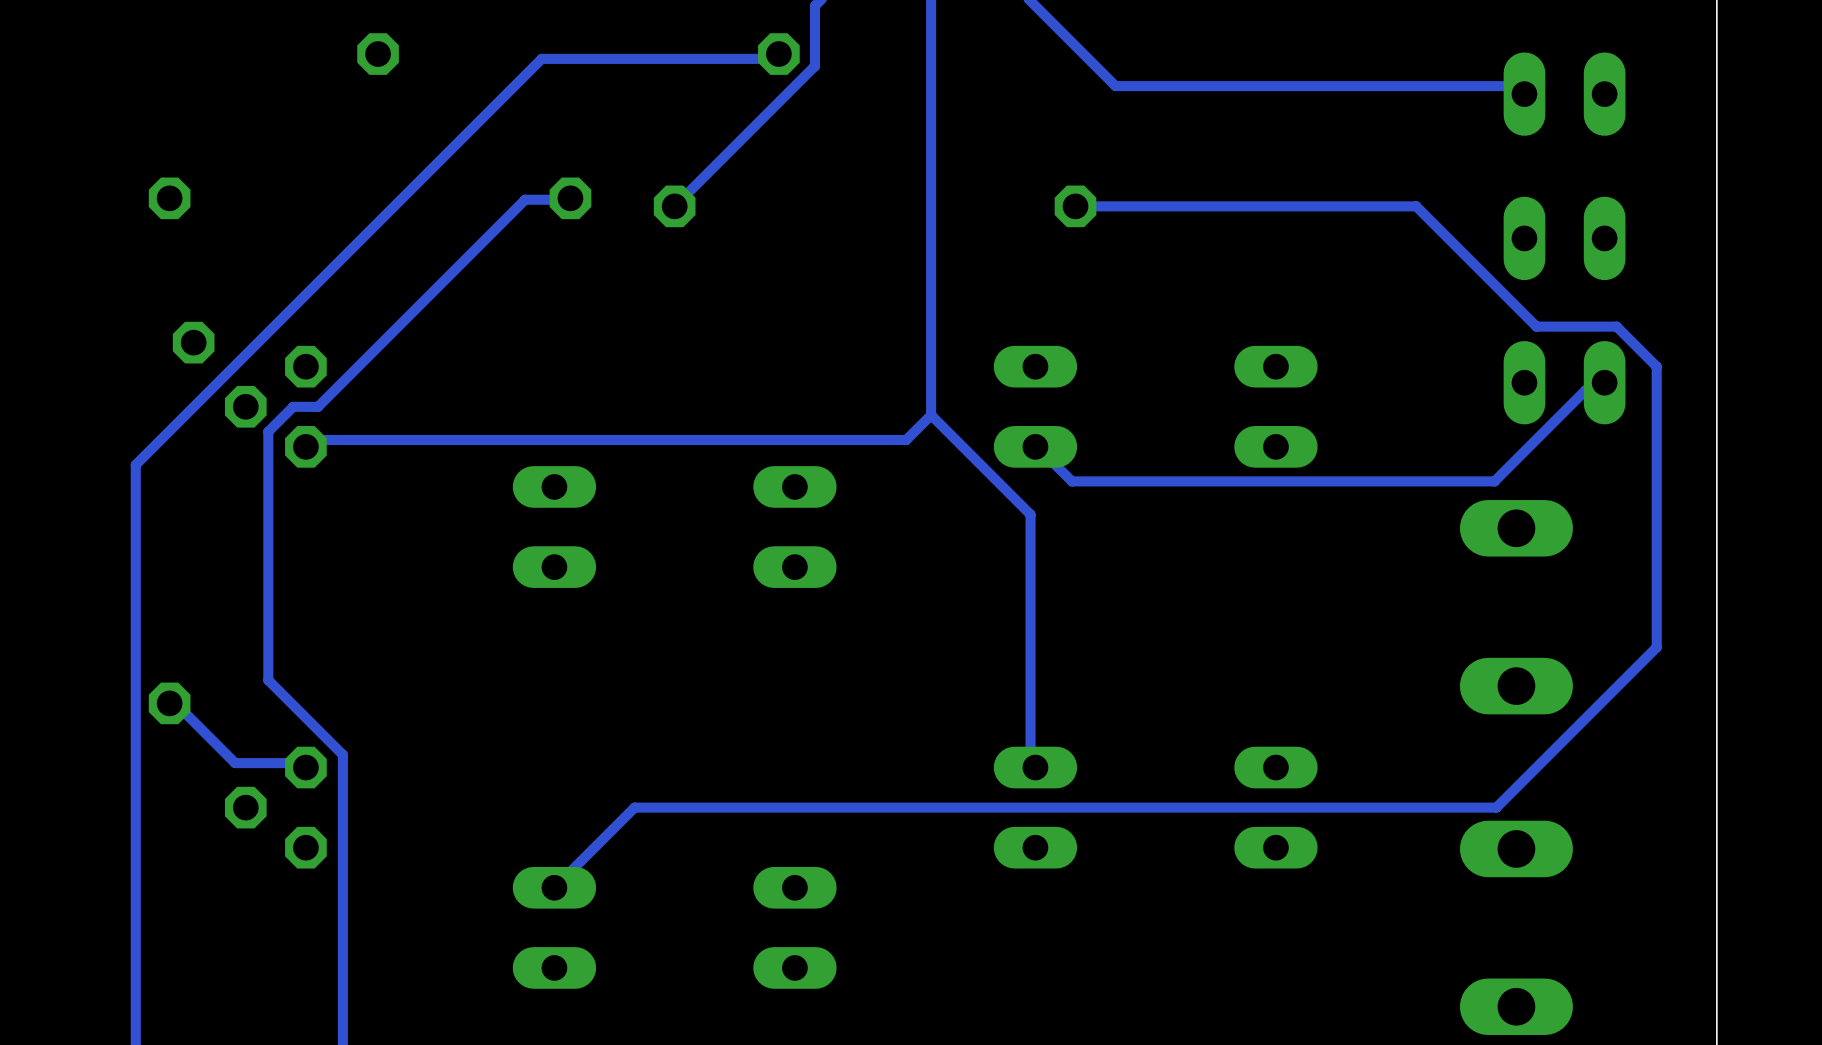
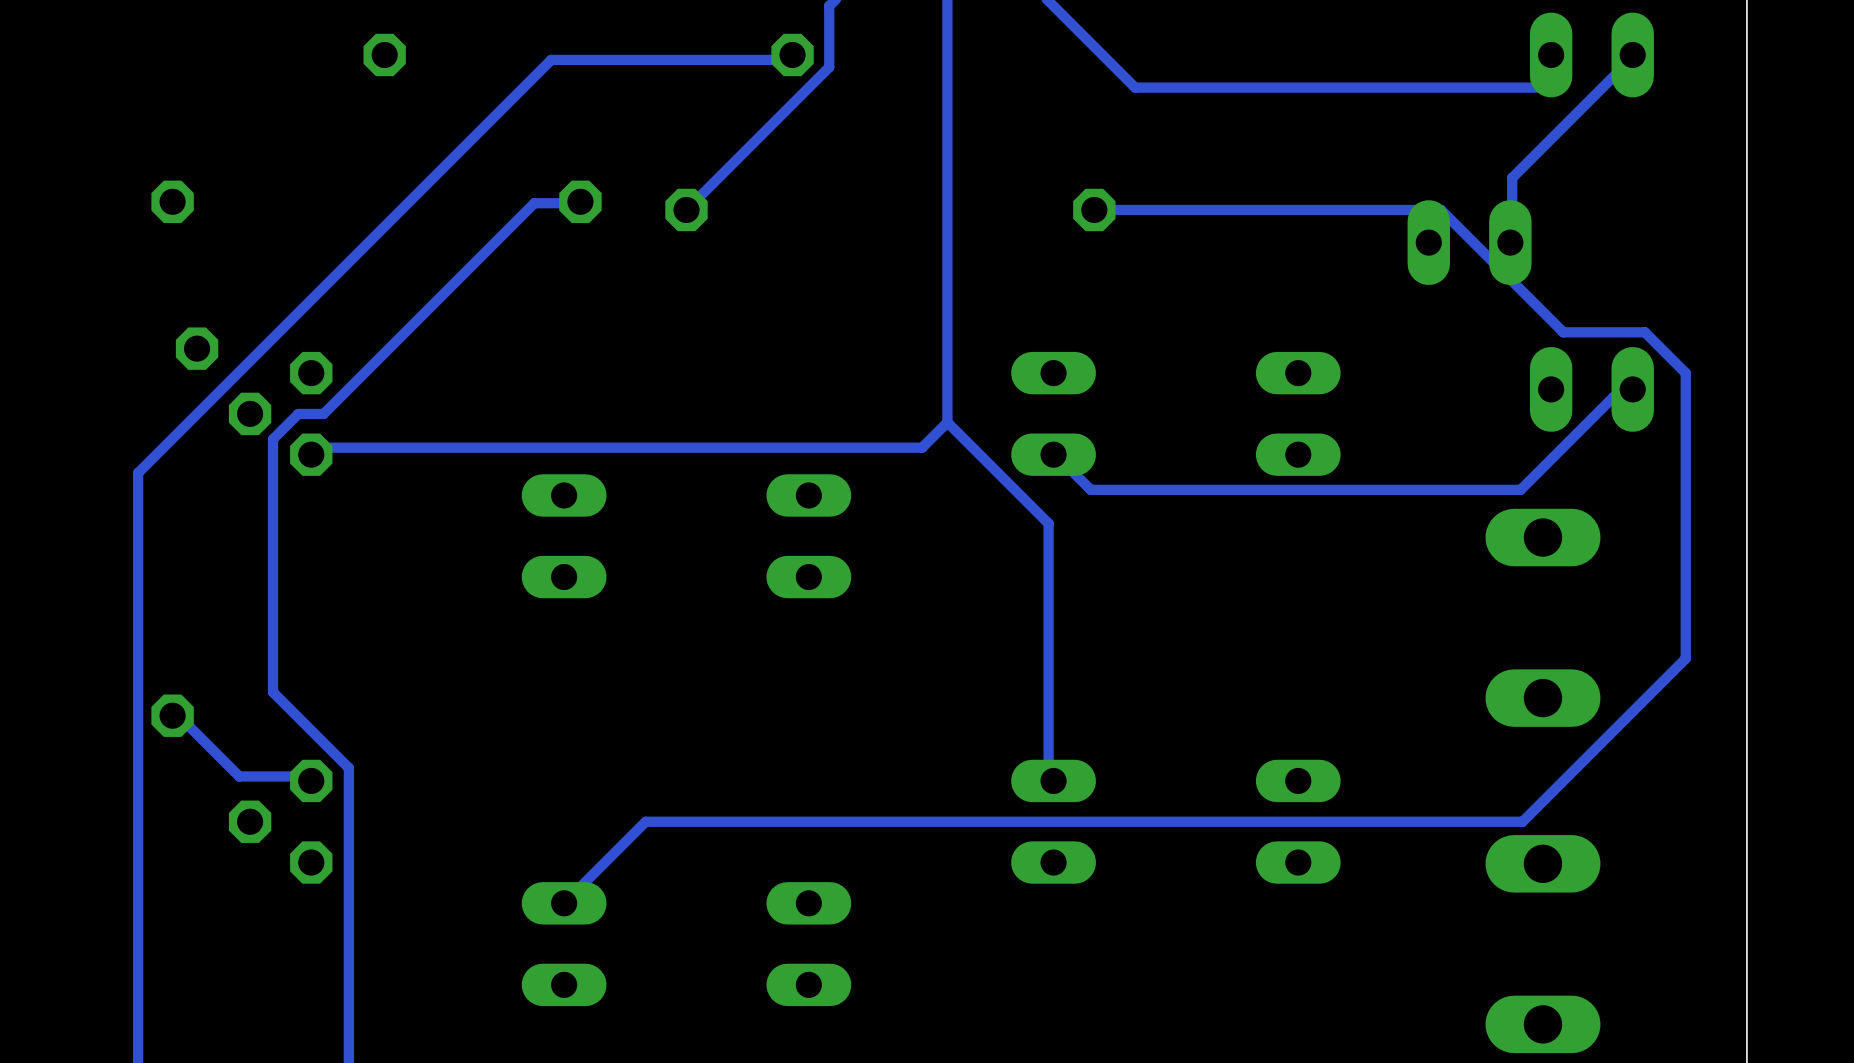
track: none -> (1632, 54) (1630, 59) (1512, 177) (1512, 236) (1510, 242)
part position: (1564, 94) -> (1591, 54)
part: none -> (1469, 242)
part: (1564, 238) -> none

